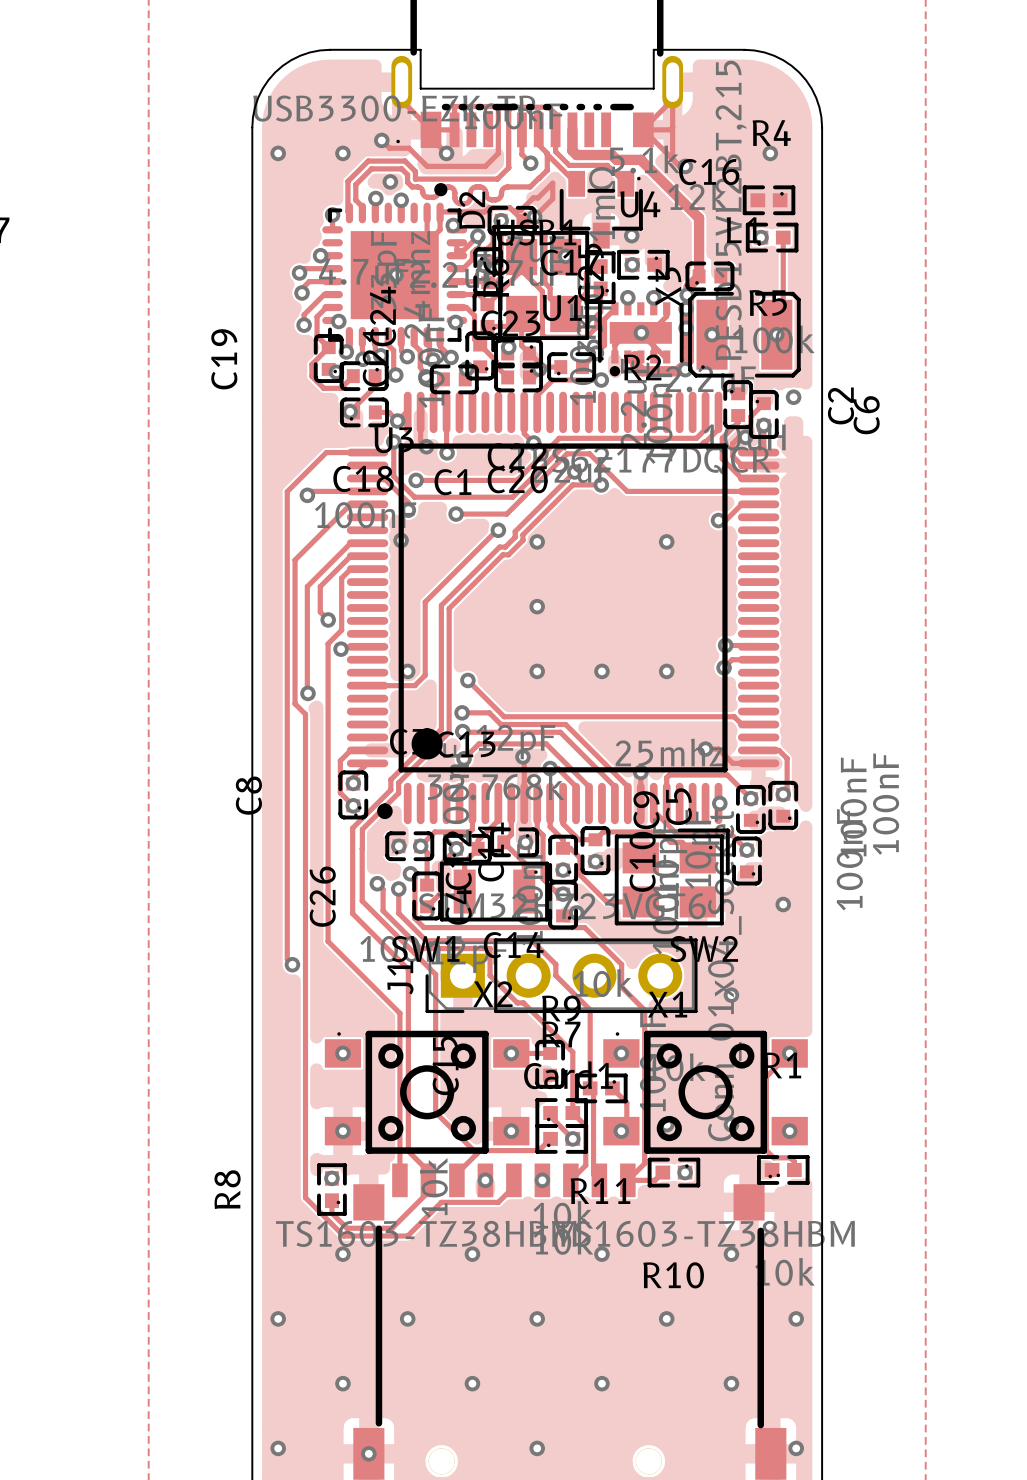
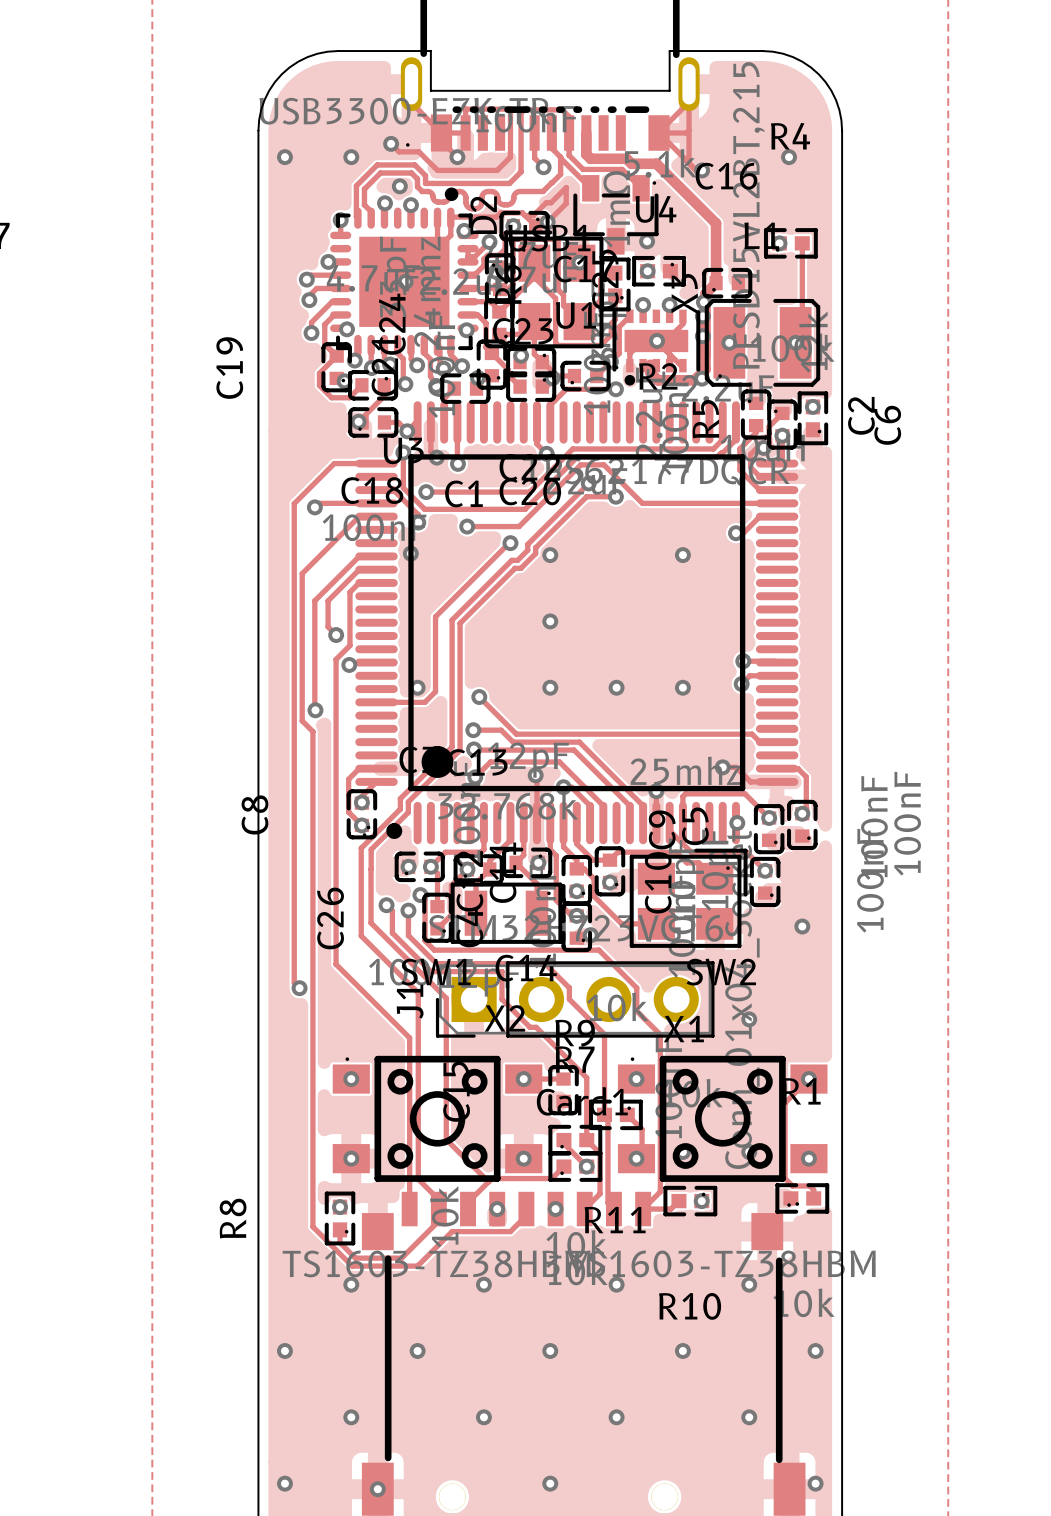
R5 rotation: 0° (769, 200) -> 90° clockwise (812, 418)
R5 position: (769, 200) -> (812, 418)

